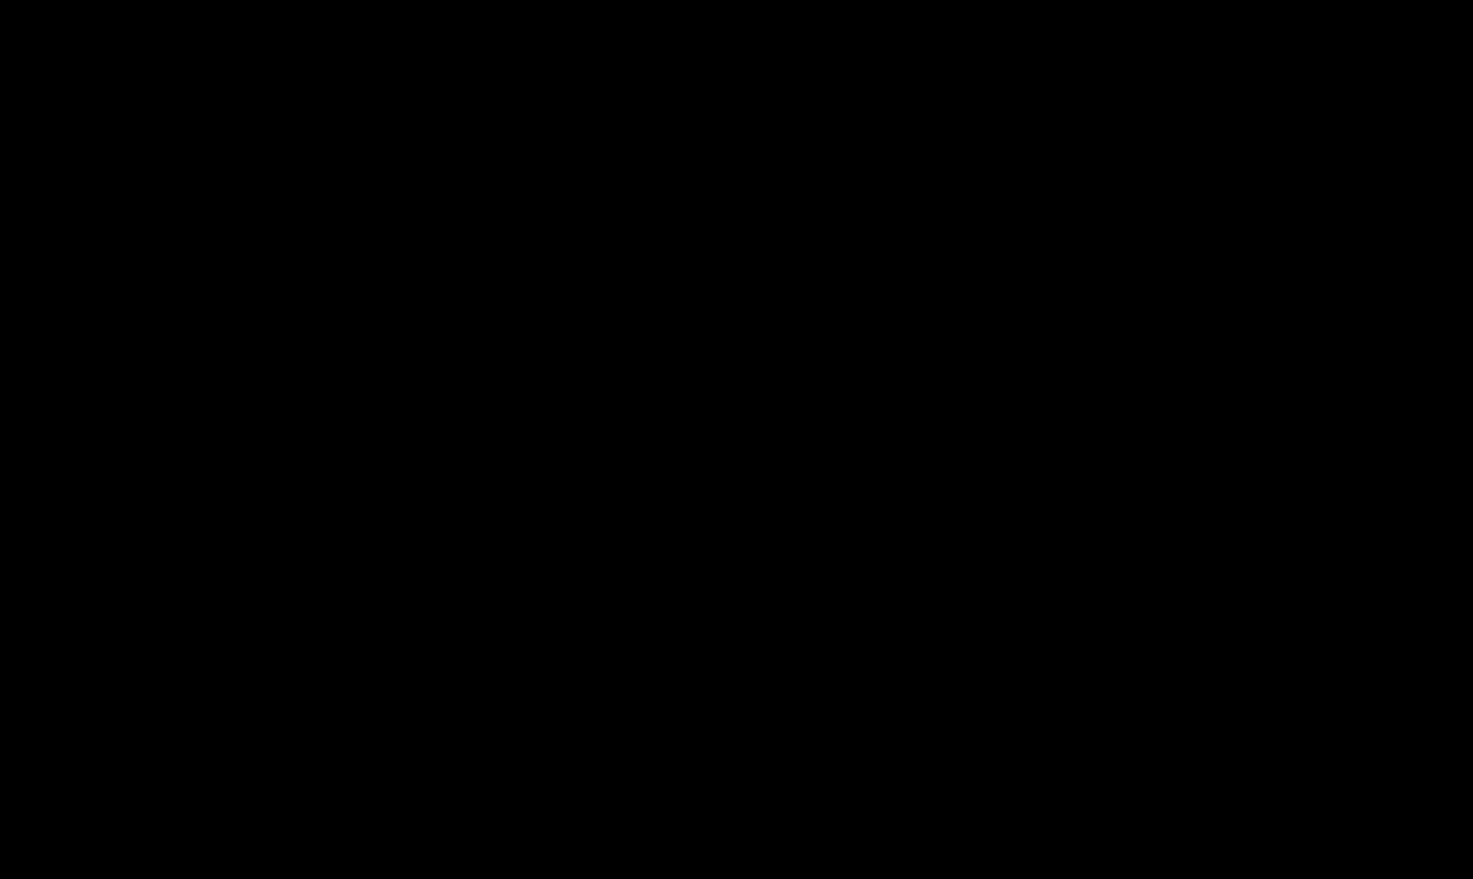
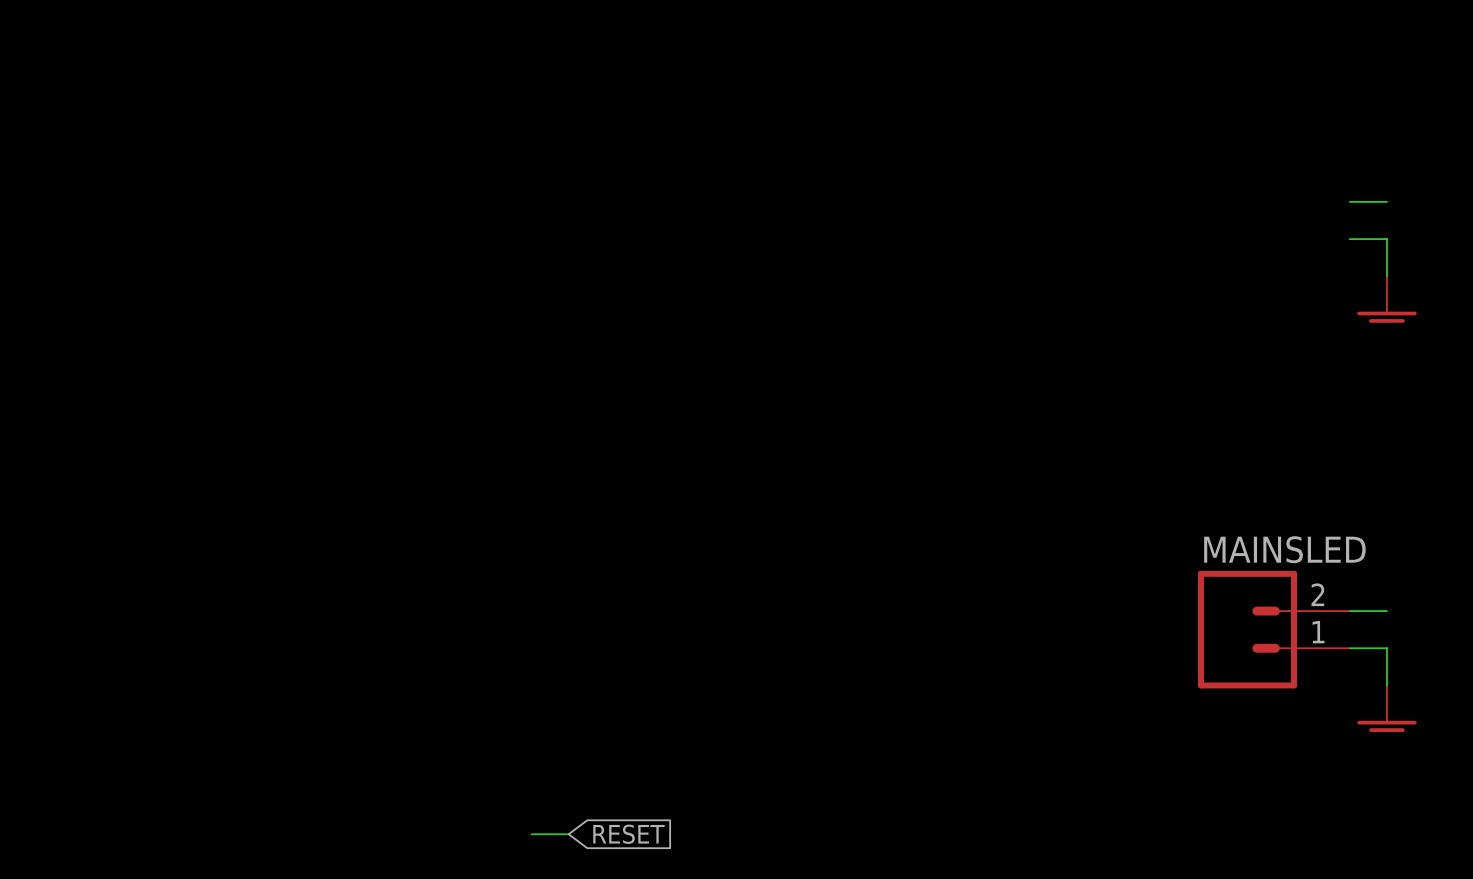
wire: none -> (1349, 201) (1386, 201)
wire: none -> (1349, 239) (1386, 239) (1386, 276)
power symbol: none -> (1386, 299)
wire: none -> (1349, 611) (1386, 611)
MAINSLED: none -> (1273, 629)
wire: none -> (1349, 648) (1386, 648) (1386, 685)
power symbol: none -> (1386, 708)
wire: none -> (531, 834) (568, 834)
global label: none -> RESET (628, 834)

